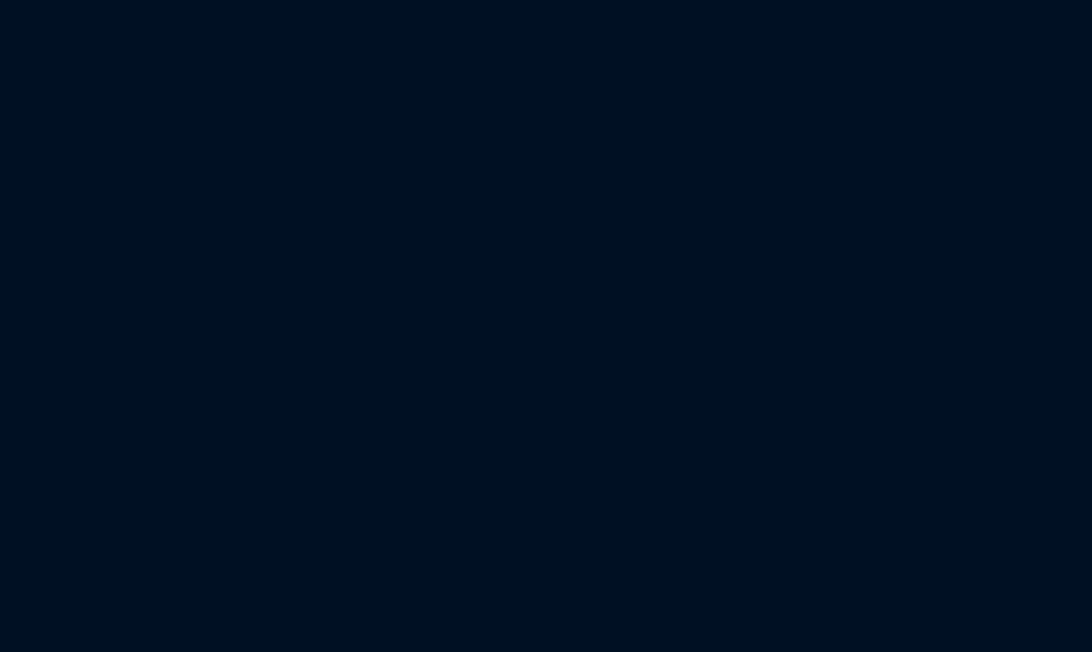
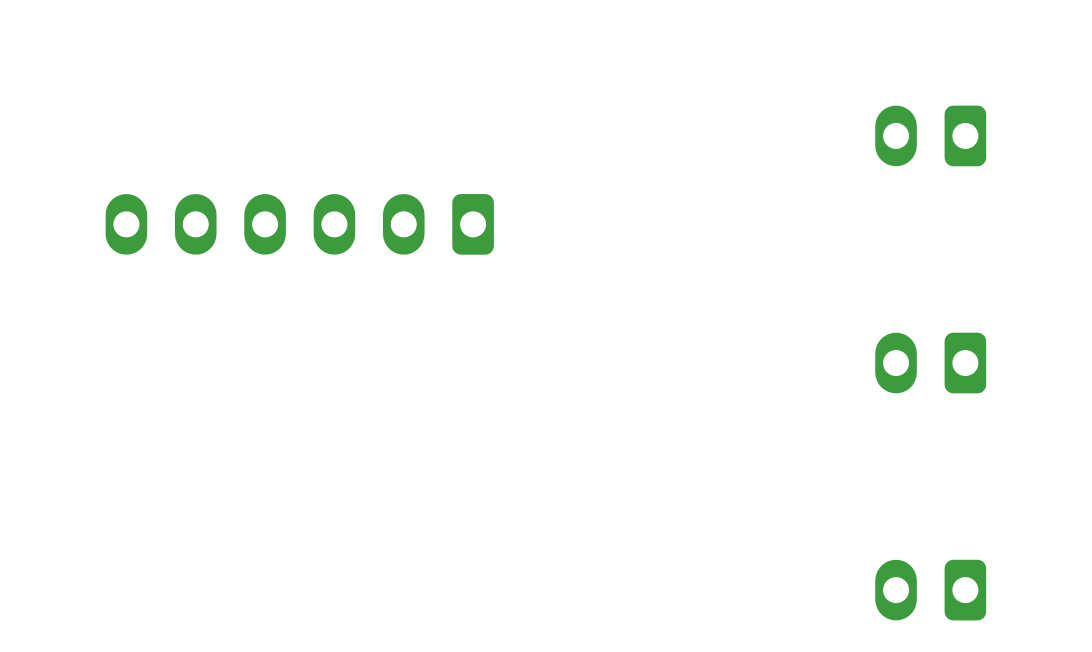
part: none -> (930, 135)
part: none -> (299, 224)
part: none -> (930, 363)
part: none -> (930, 590)

